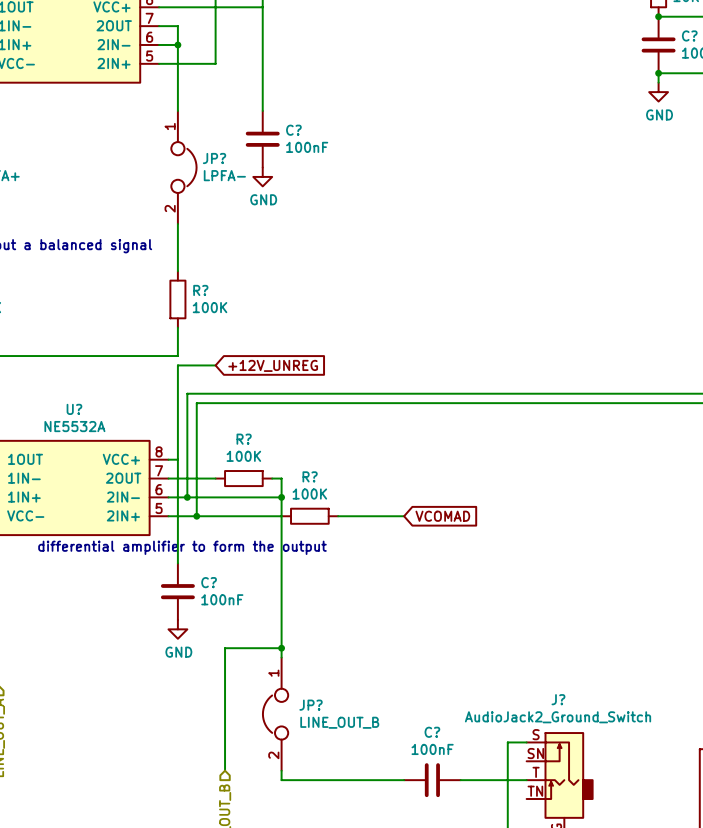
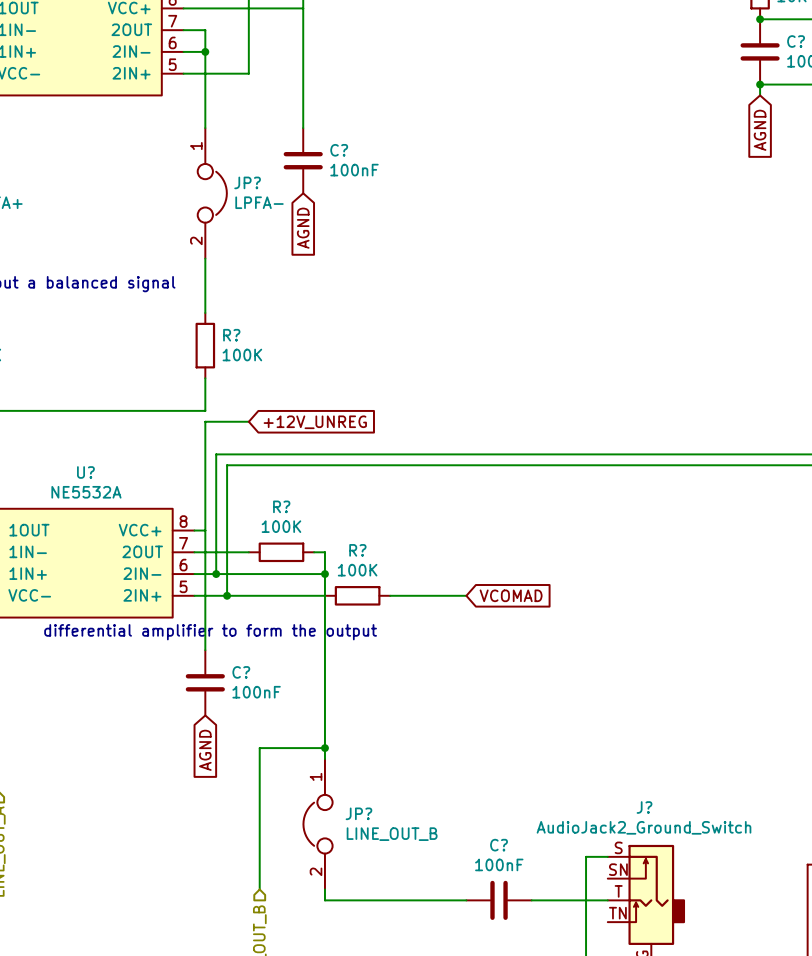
power symbol: GND (658, 92) -> none
global label: none -> AGND (760, 130)
power symbol: GND (262, 176) -> none
global label: none -> AGND (303, 228)
power symbol: GND (177, 629) -> none
global label: none -> AGND (205, 750)

